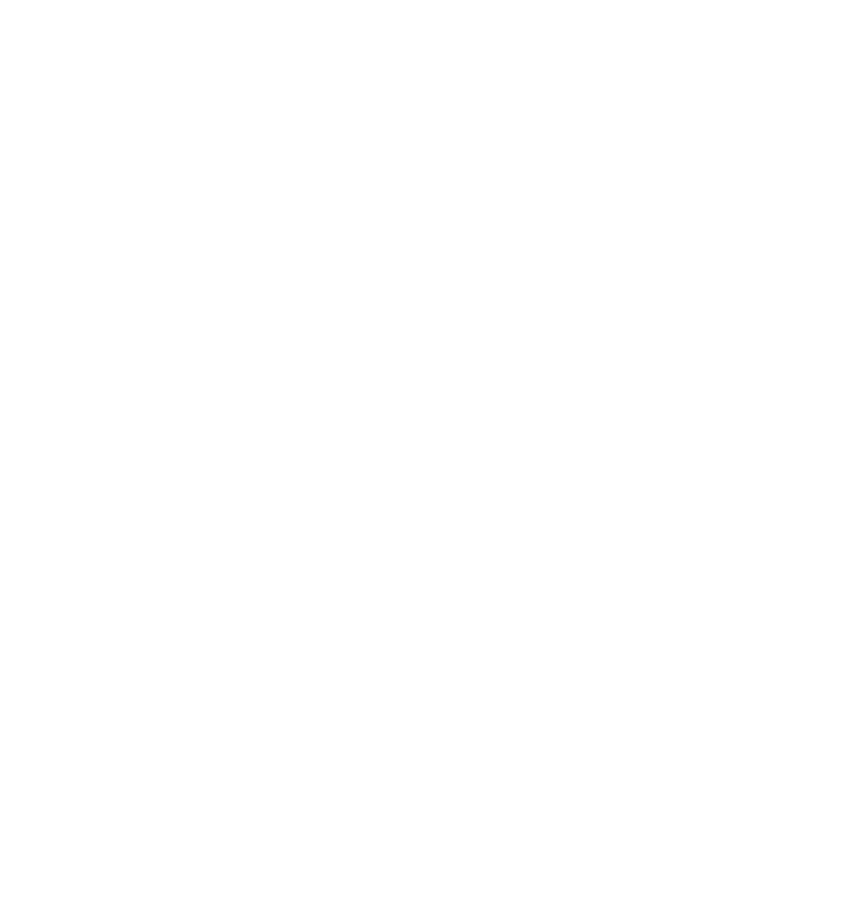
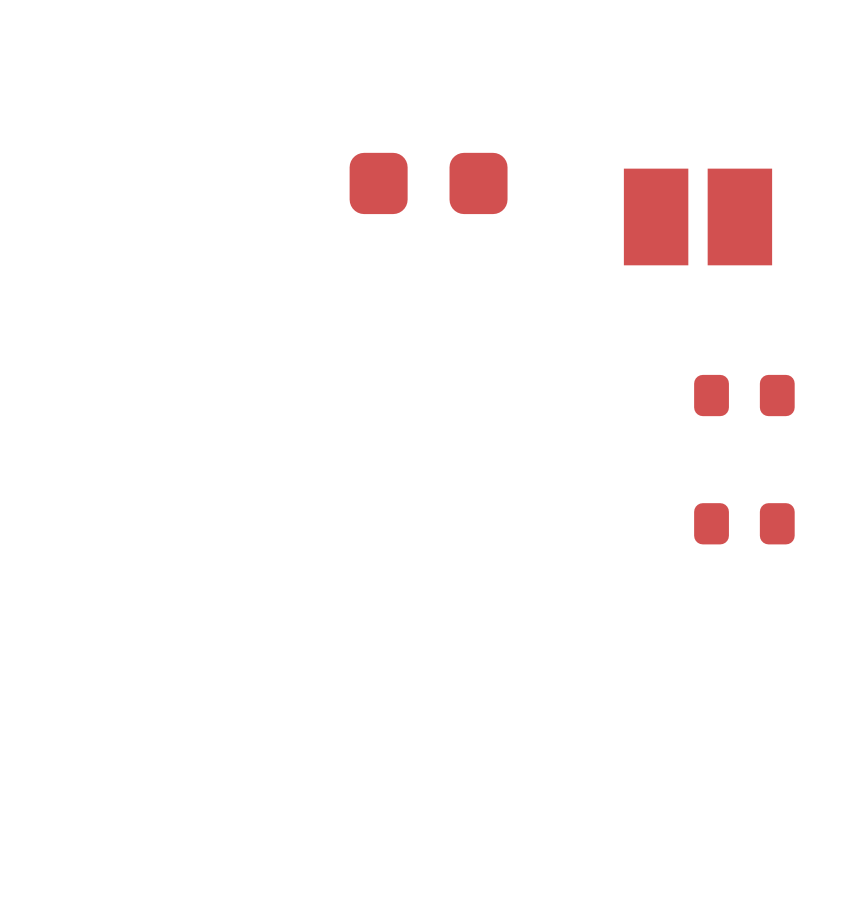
part: none -> (428, 183)
part: none -> (697, 216)
part: none -> (744, 395)
part: none -> (744, 523)

